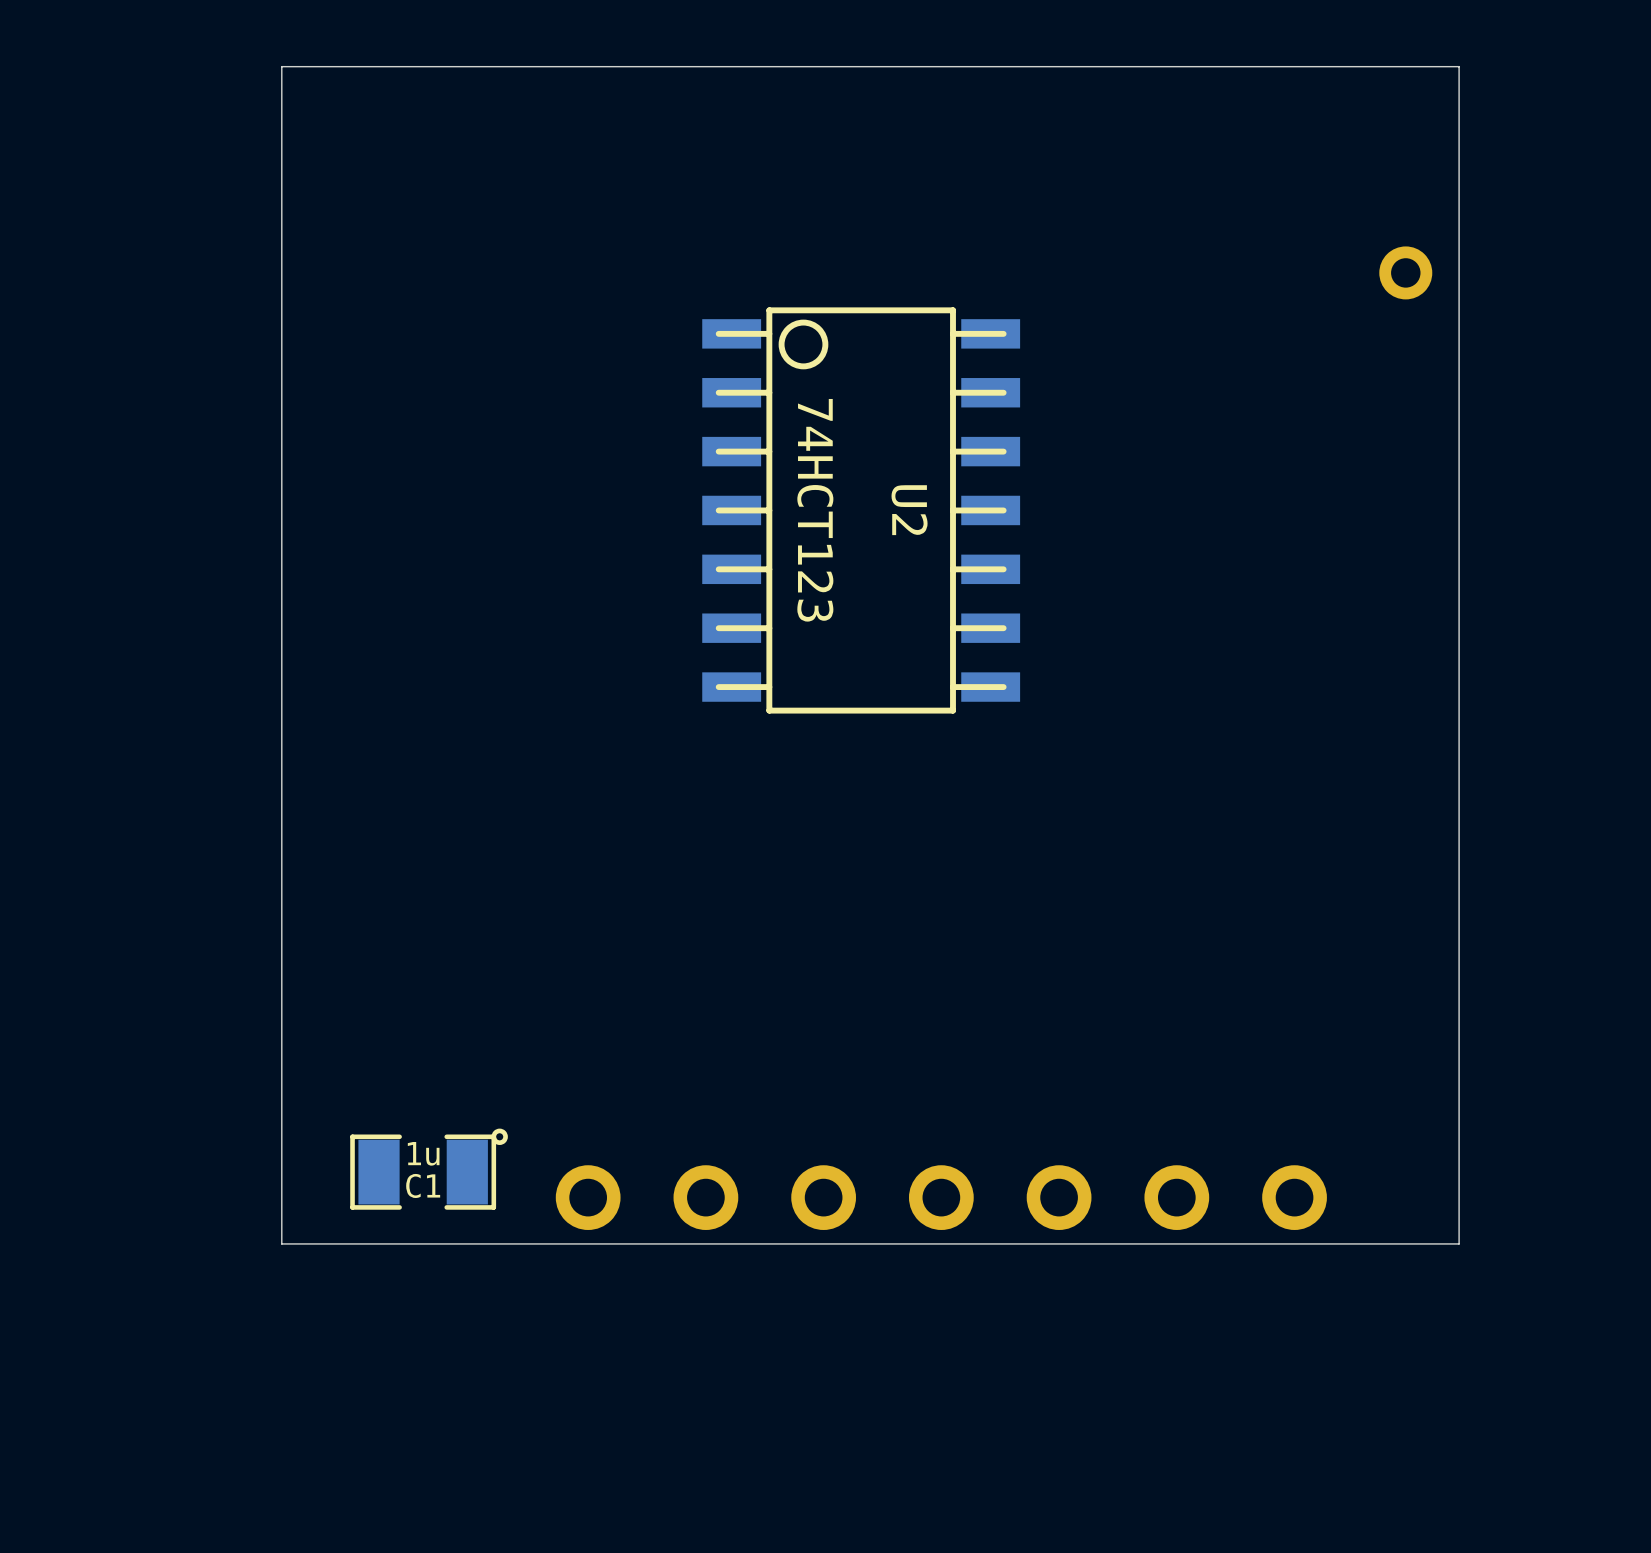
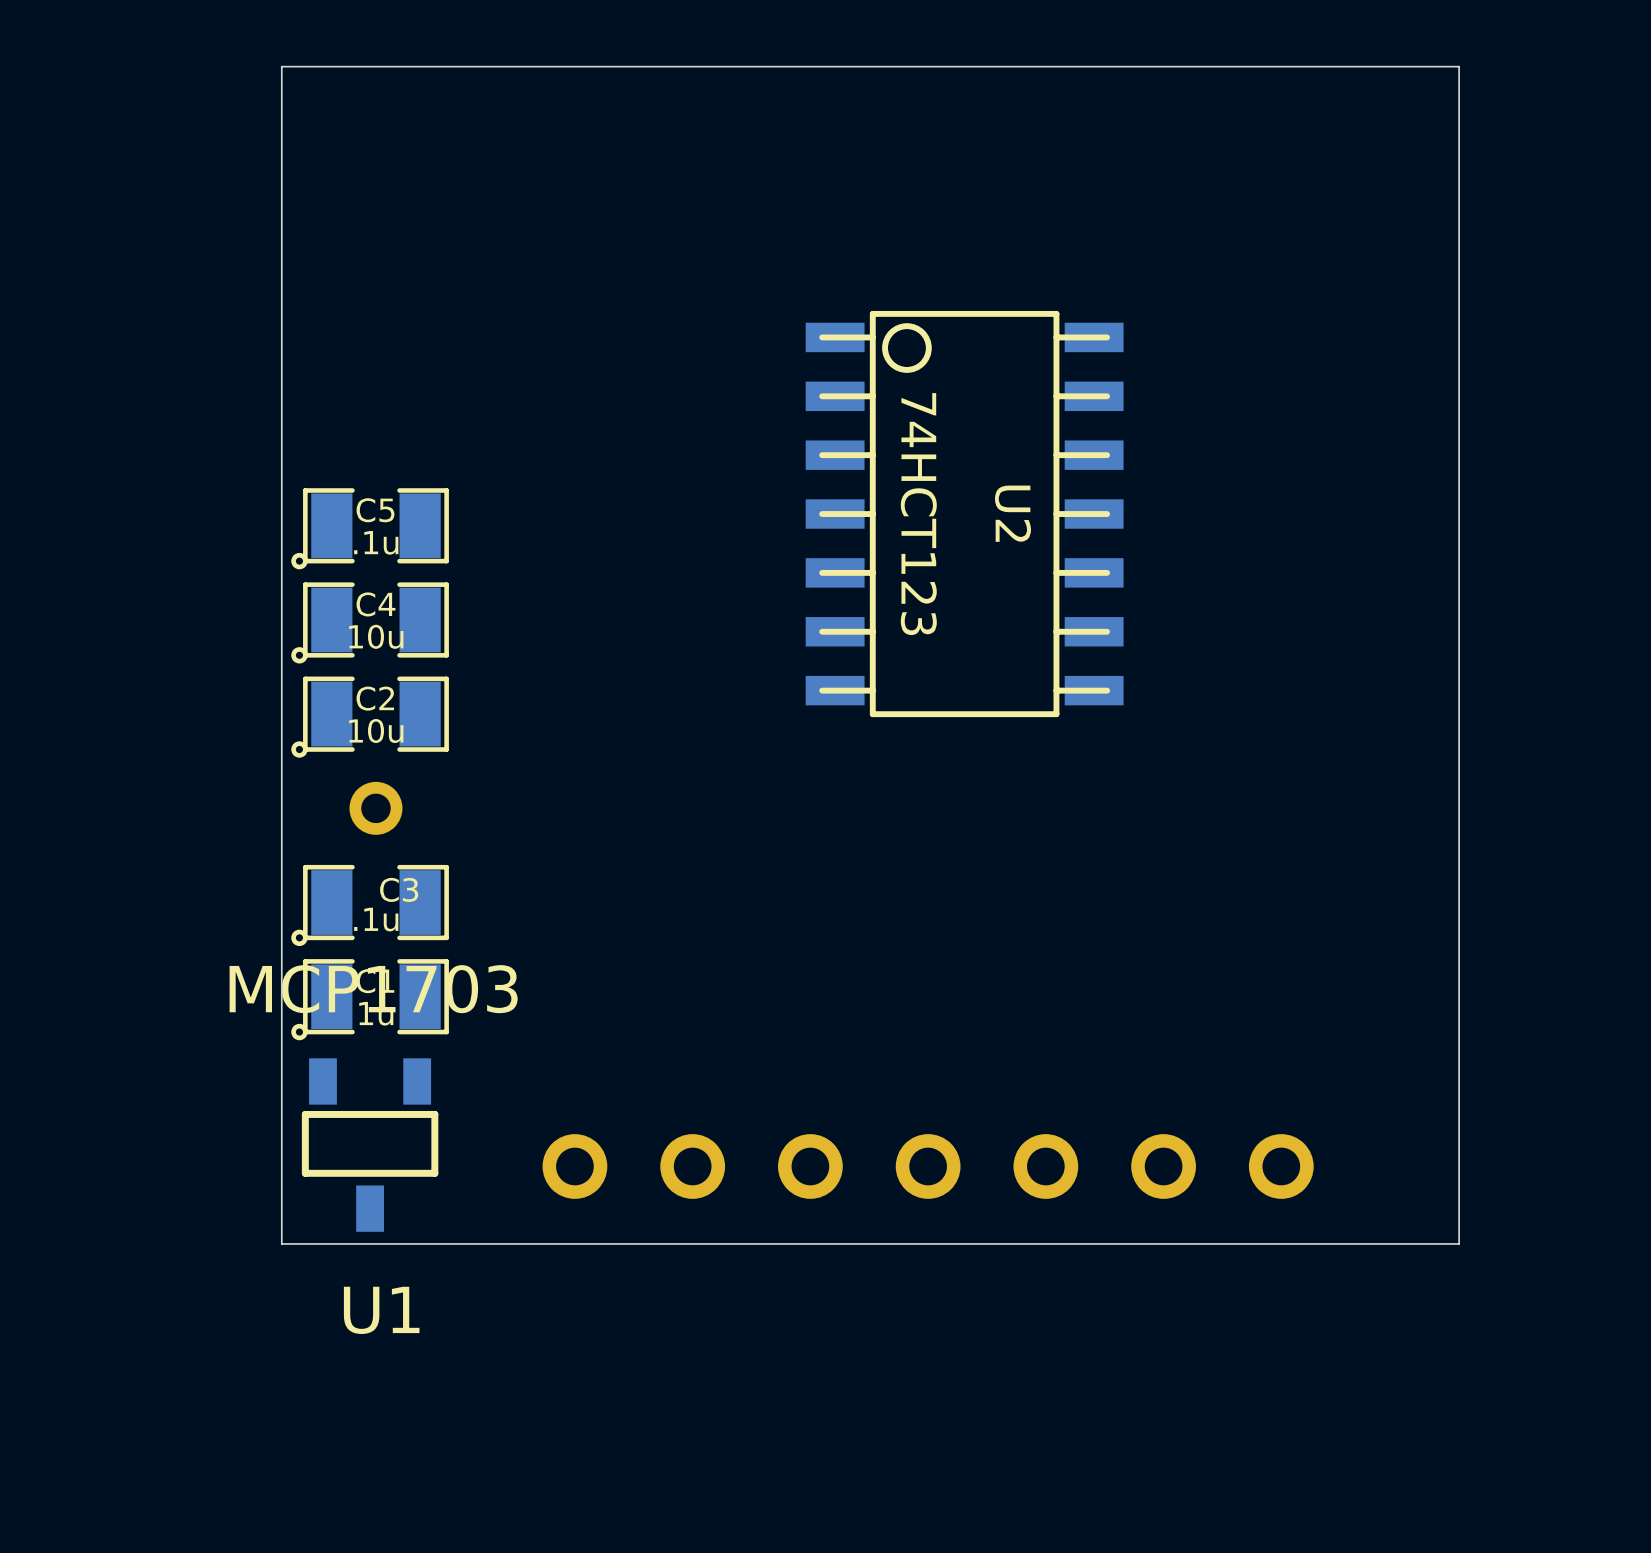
part: (1405, 272) -> none
U2 position: (861, 510) -> (964, 514)
C5: none -> .1u (370, 528)
C4: none -> 10u (370, 622)
C2: none -> 10u (370, 717)
part: none -> (375, 808)
C3: none -> .1u (370, 905)
U1: none -> MCP1703 (370, 1145)
C1 rotation: 0° (429, 1169) -> 180° (370, 999)
C1 position: (429, 1169) -> (370, 999)
part position: (941, 1197) -> (928, 1166)

